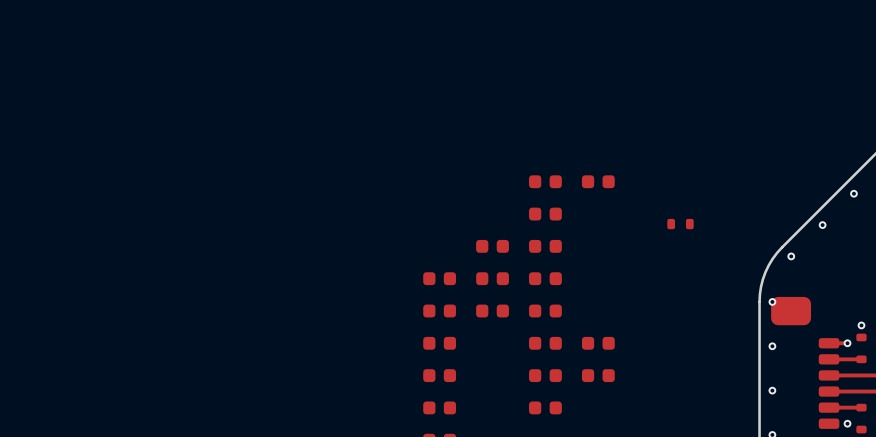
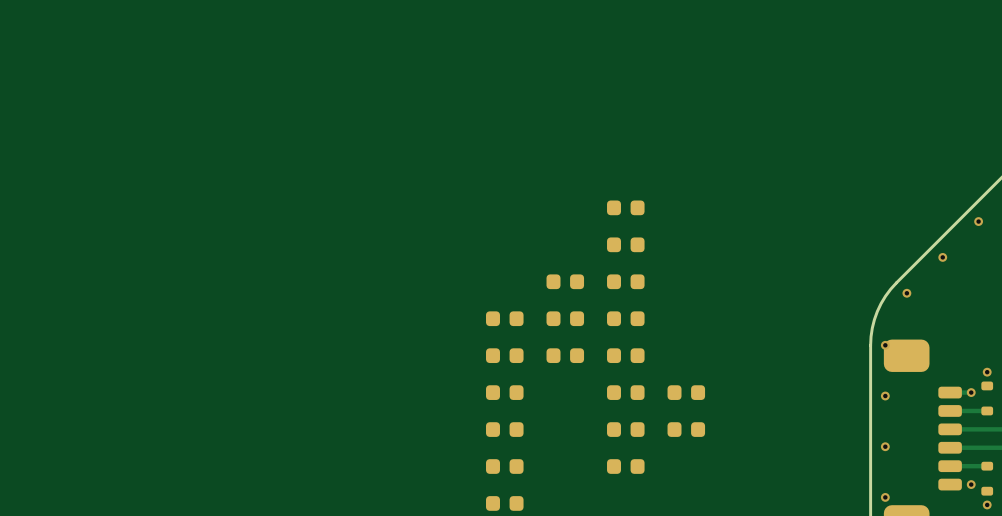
part: (598, 181) -> none
part: (680, 224) -> none

